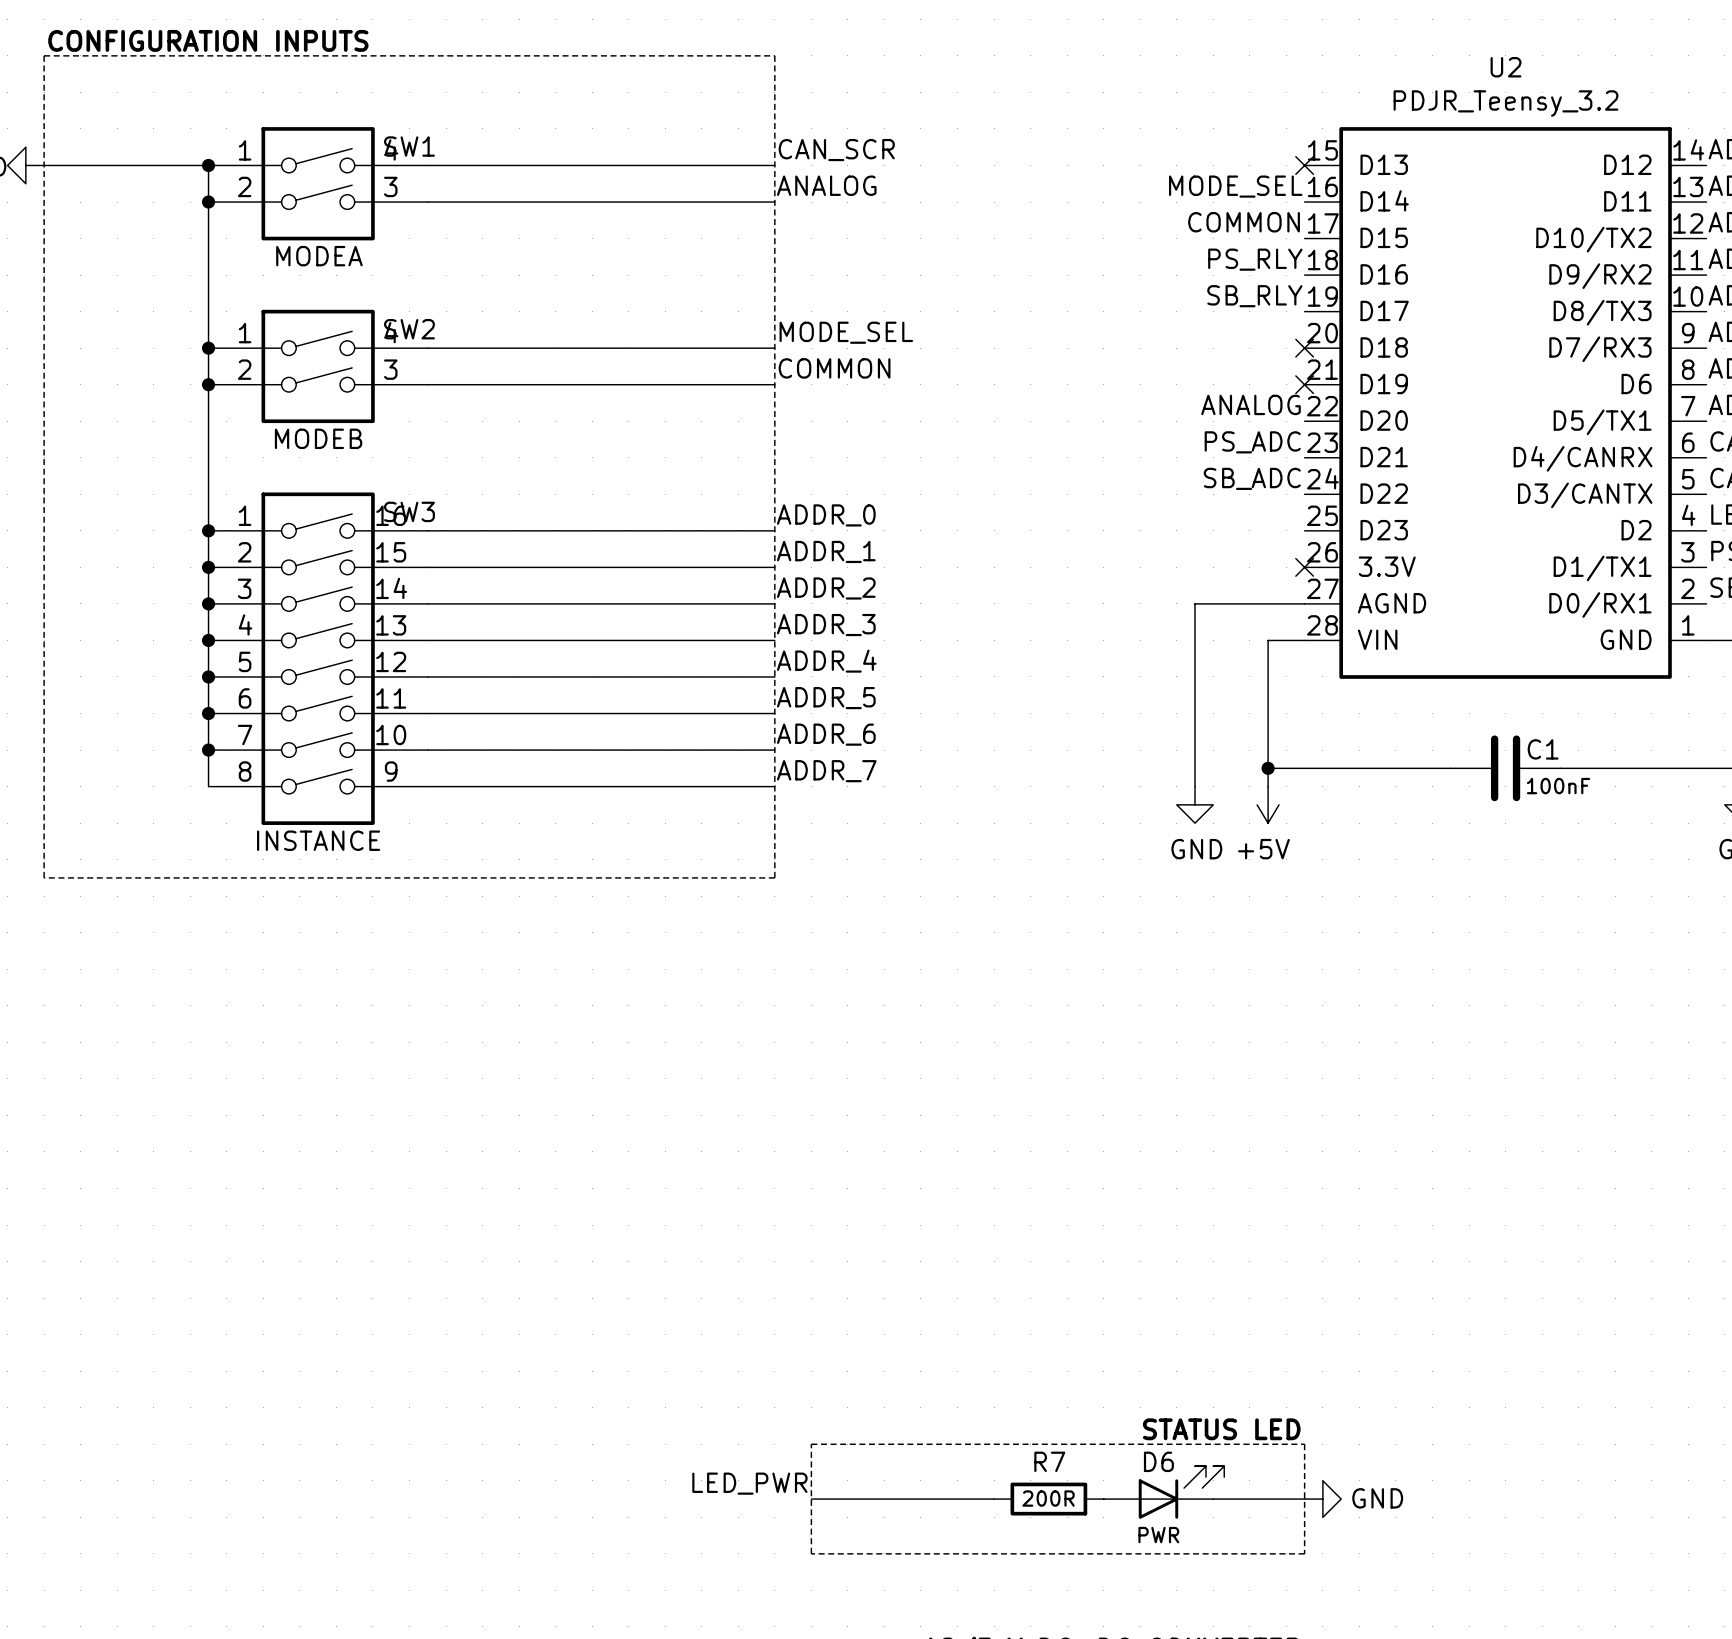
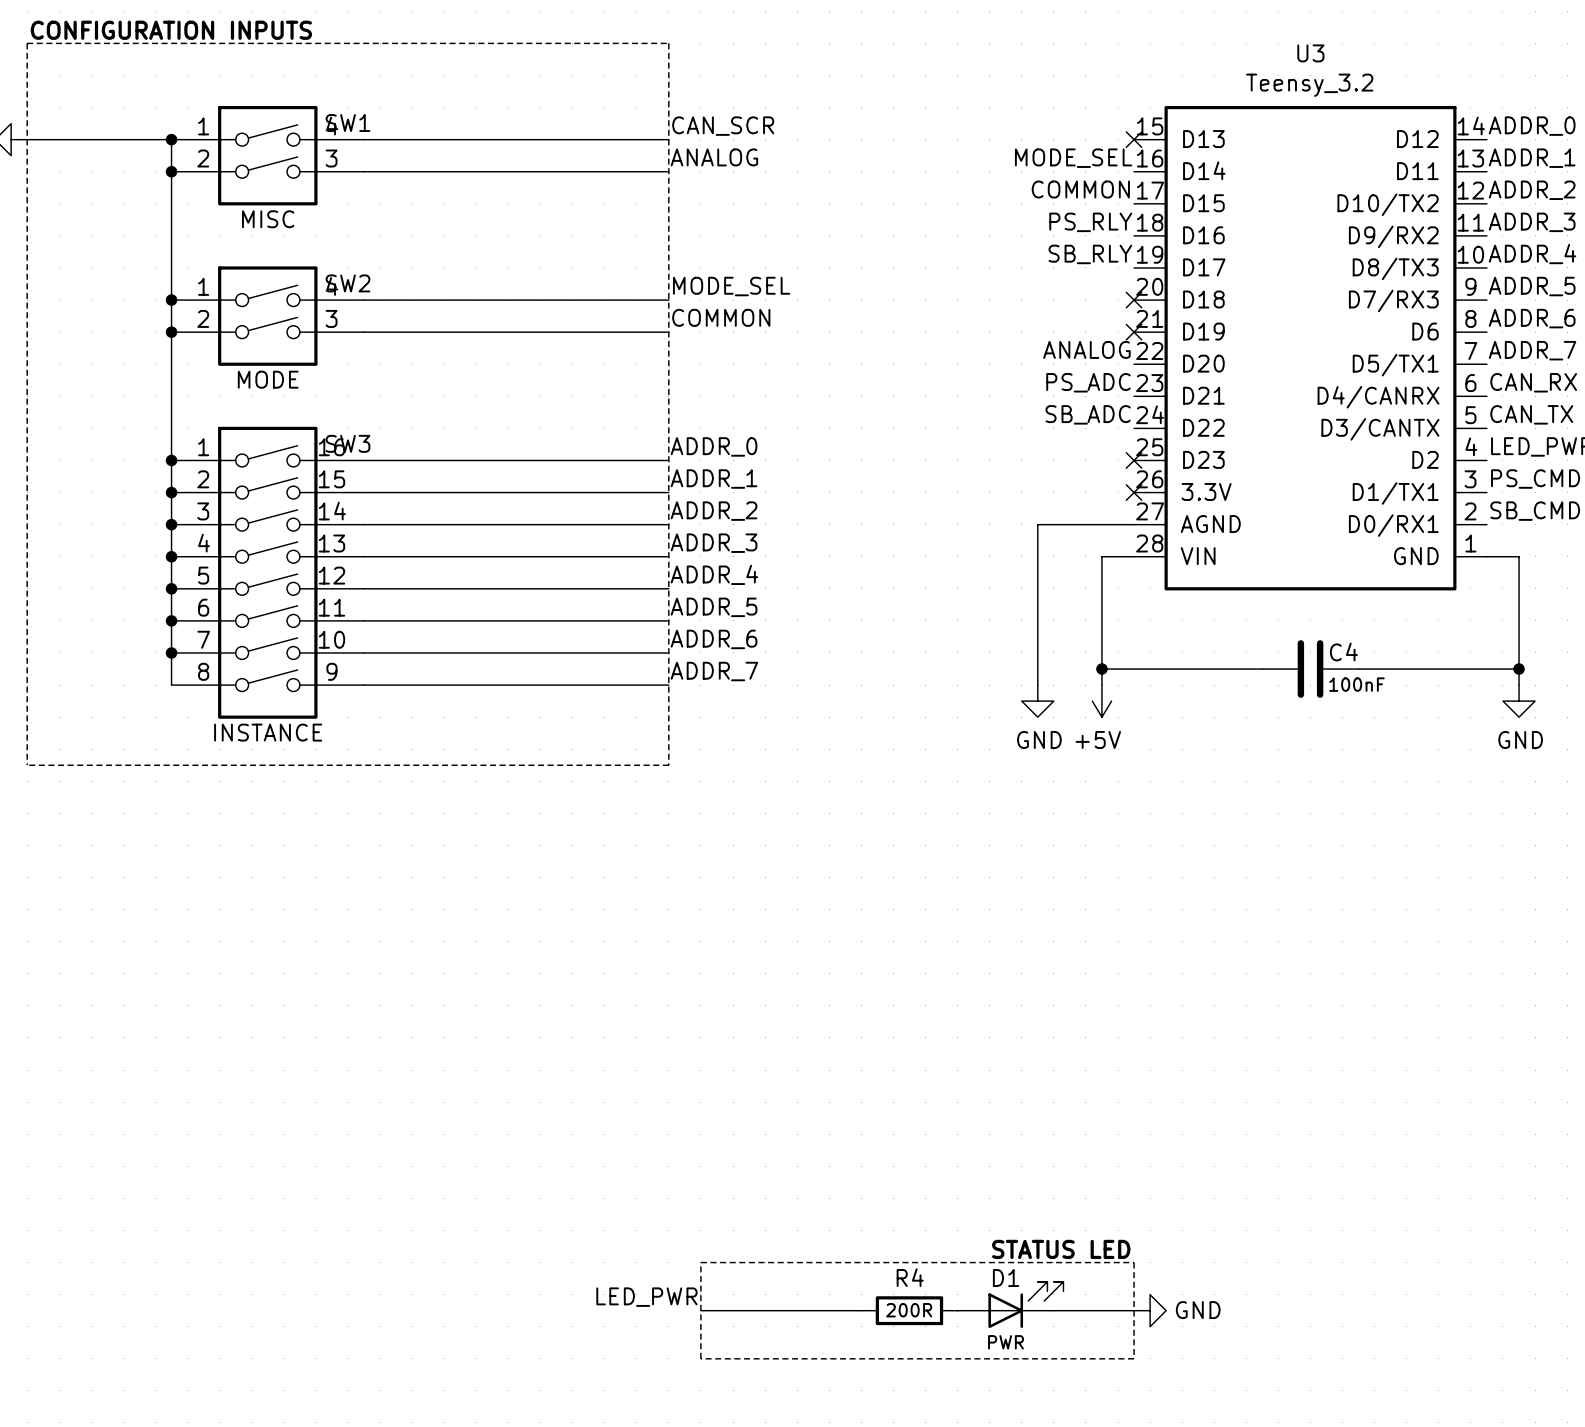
U2 name: U2 (1506, 67) -> U3 (1310, 53)
U2 value: PDJR_Teensy_3.2 (1506, 103) -> Teensy_3.2 (1309, 85)
SW1 value: MODEA (319, 256) -> MISC (268, 219)
SW2 value: MODEB (318, 438) -> MODE (268, 379)
no-connect mark: none -> (1134, 460)
C1 name: C1 (1543, 749) -> C4 (1343, 652)
R7 name: R7 (1049, 1461) -> R4 (910, 1277)
D6 name: D6 (1158, 1461) -> D1 (1006, 1278)

